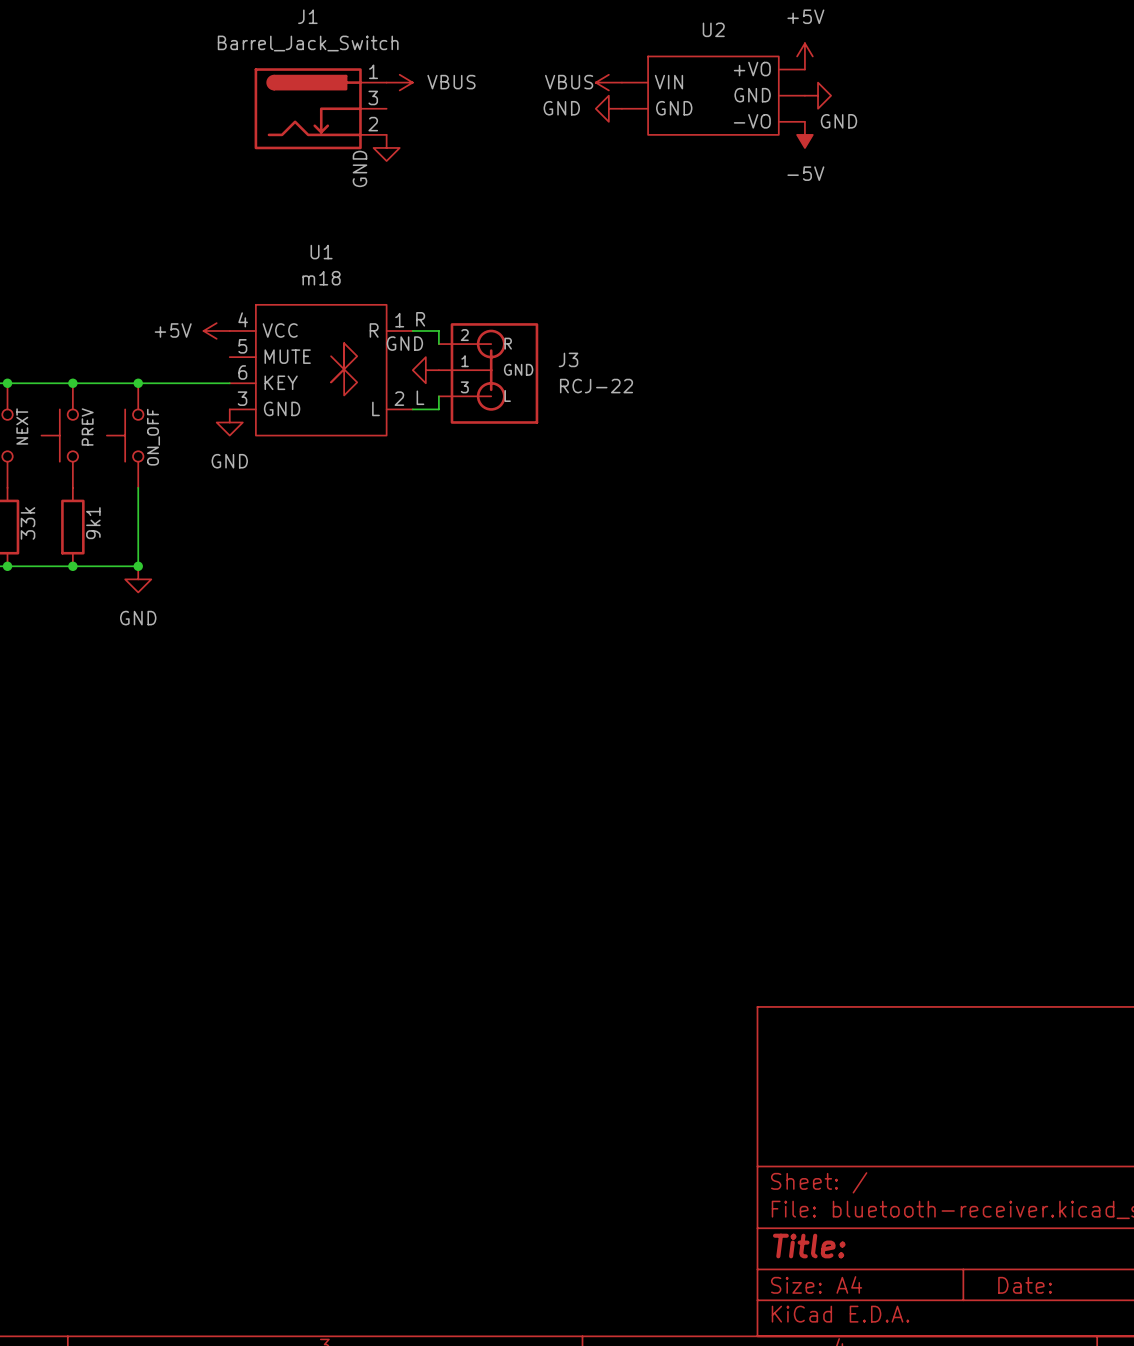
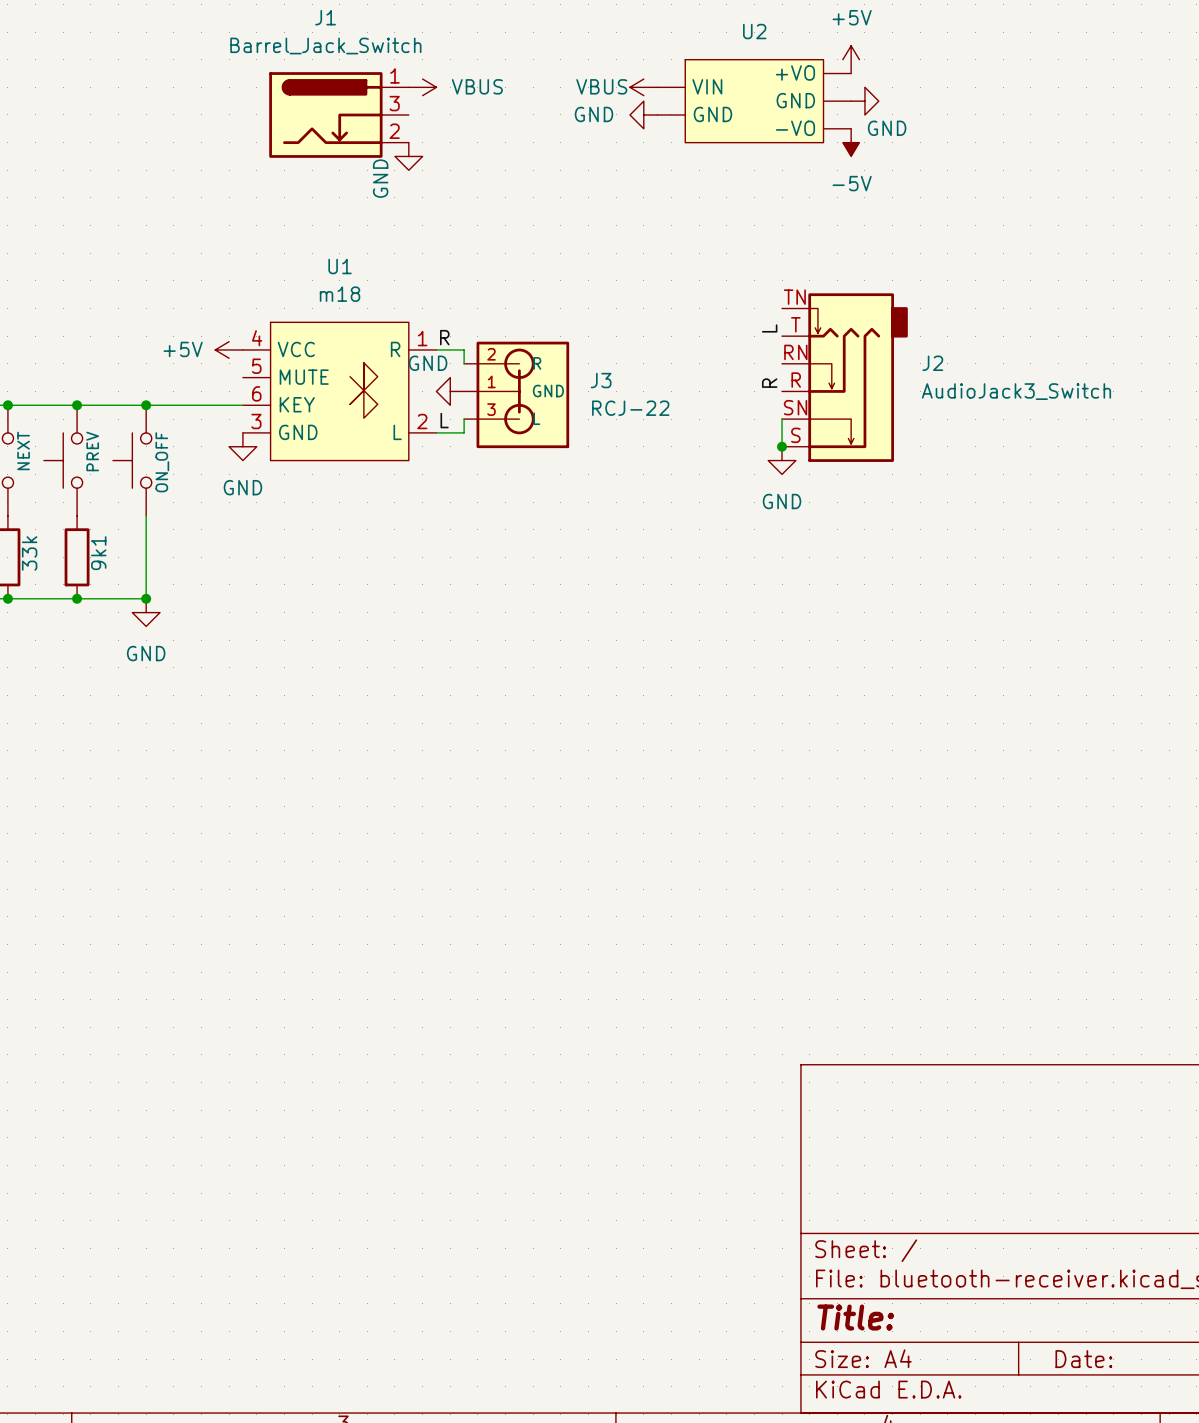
label: none -> L (769, 328)
J2: none -> AudioJack3_Switch (844, 377)
label: none -> R (769, 383)
wire: none -> (782, 419) (782, 446)
junction: none -> (782, 446)
power symbol: none -> GND (782, 460)

